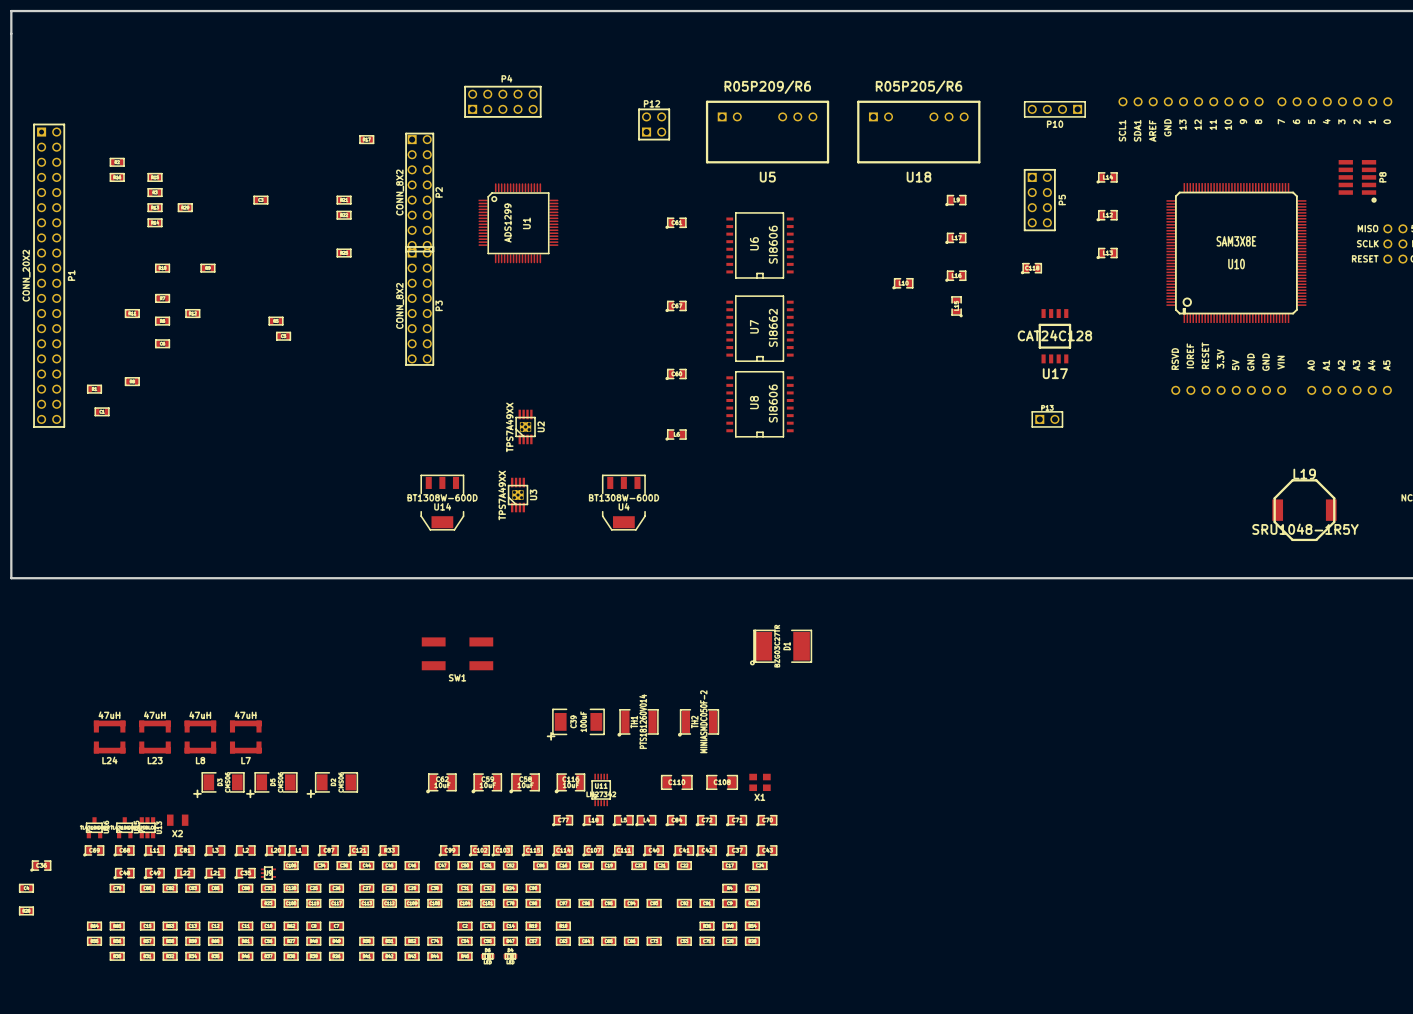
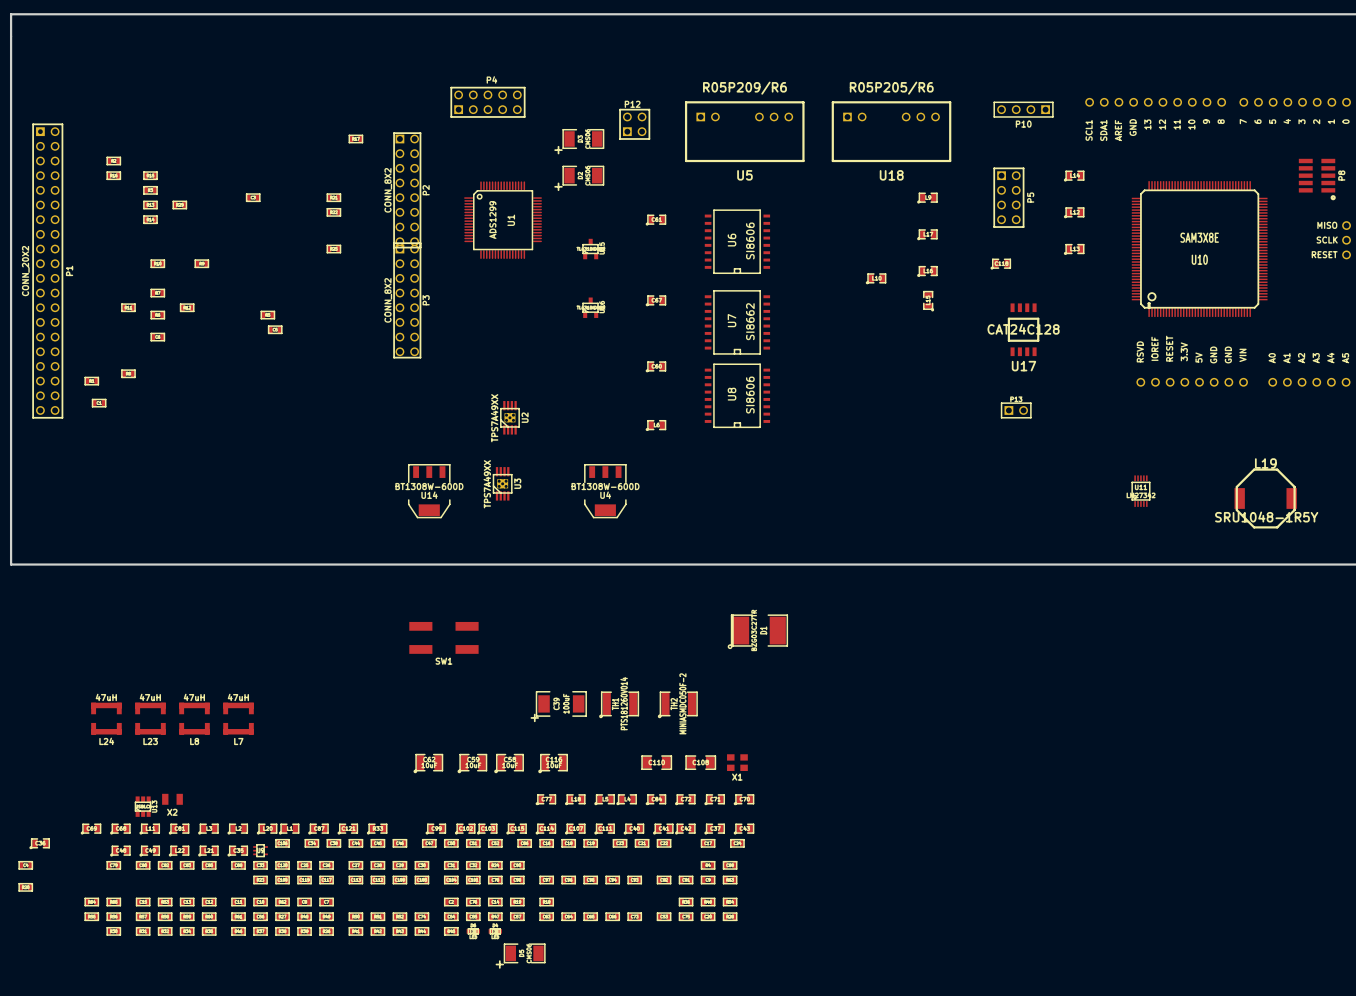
part position: (223, 782) -> (583, 138)
part position: (276, 782) -> (524, 953)
part position: (336, 782) -> (583, 175)
part position: (601, 789) -> (1140, 491)
part position: (94, 827) -> (590, 307)
part position: (124, 827) -> (590, 249)

